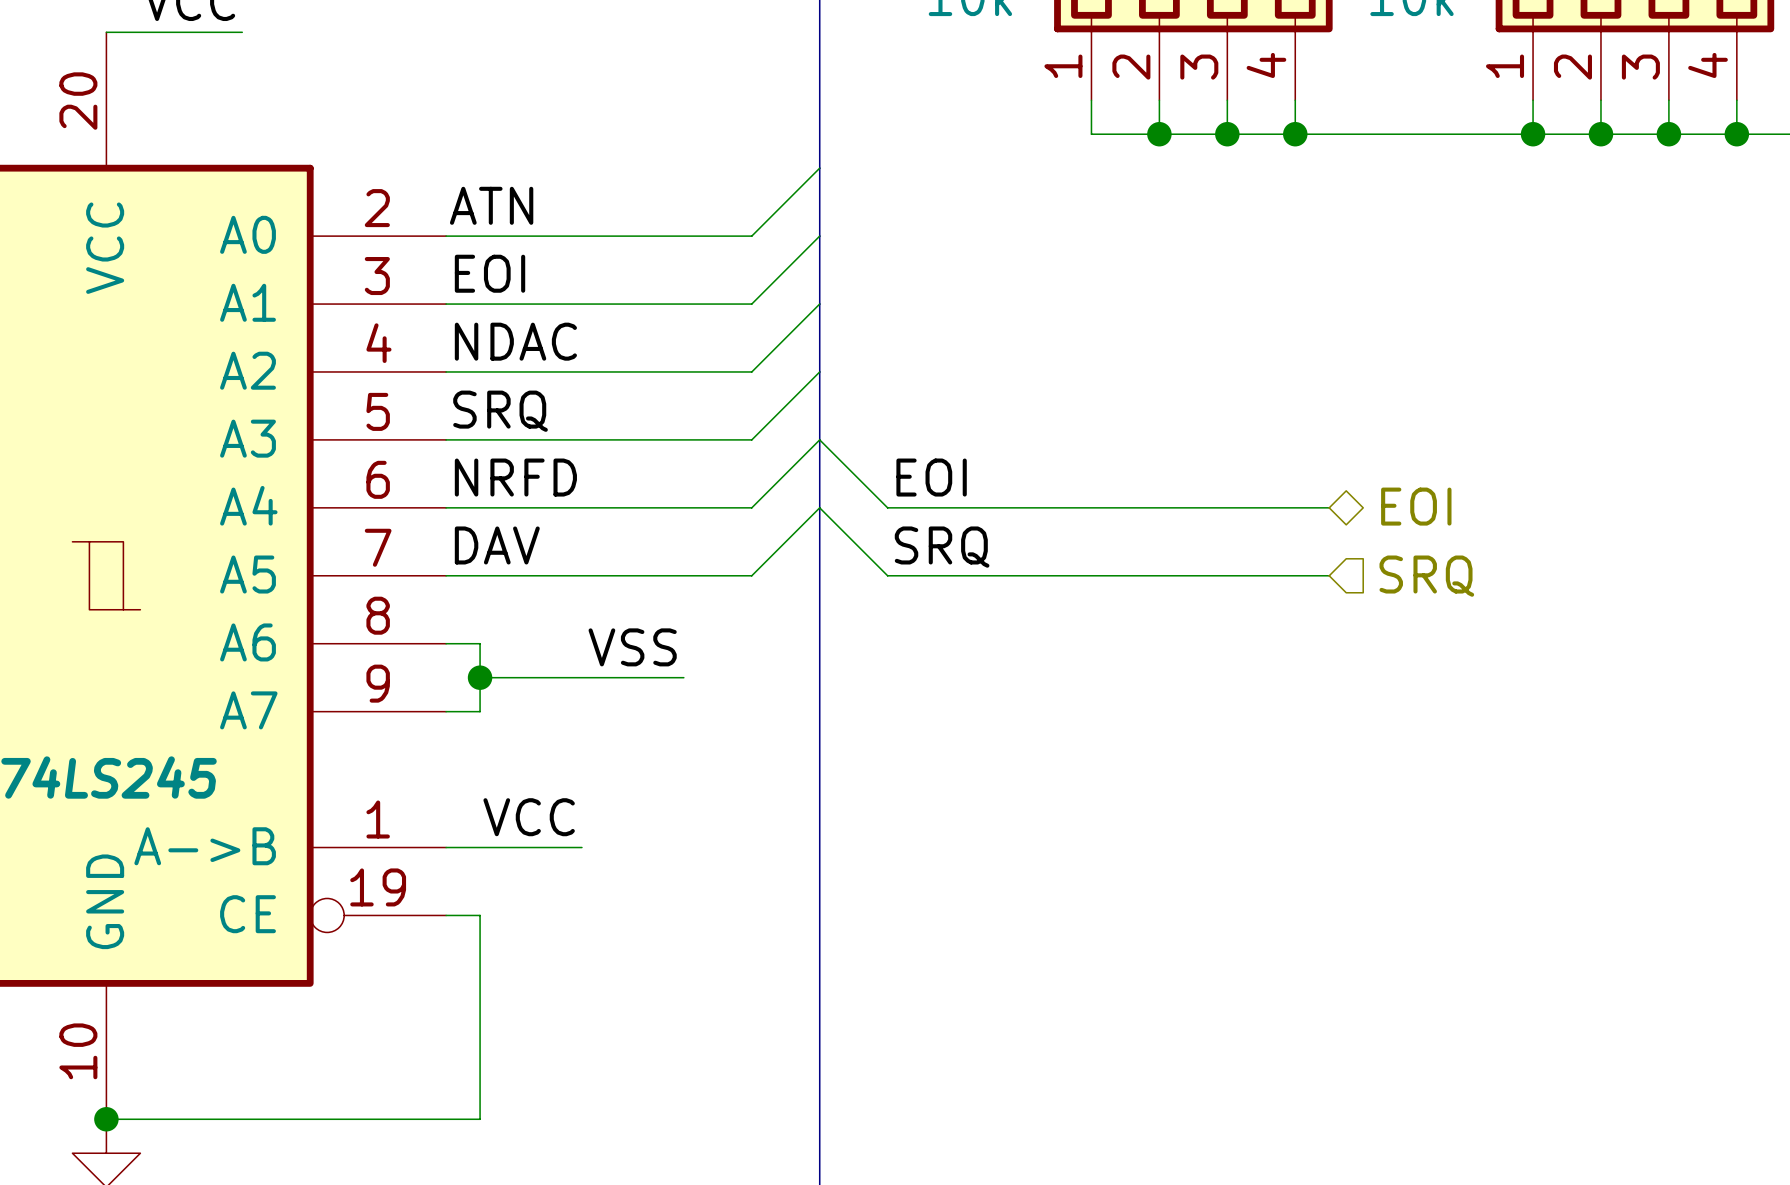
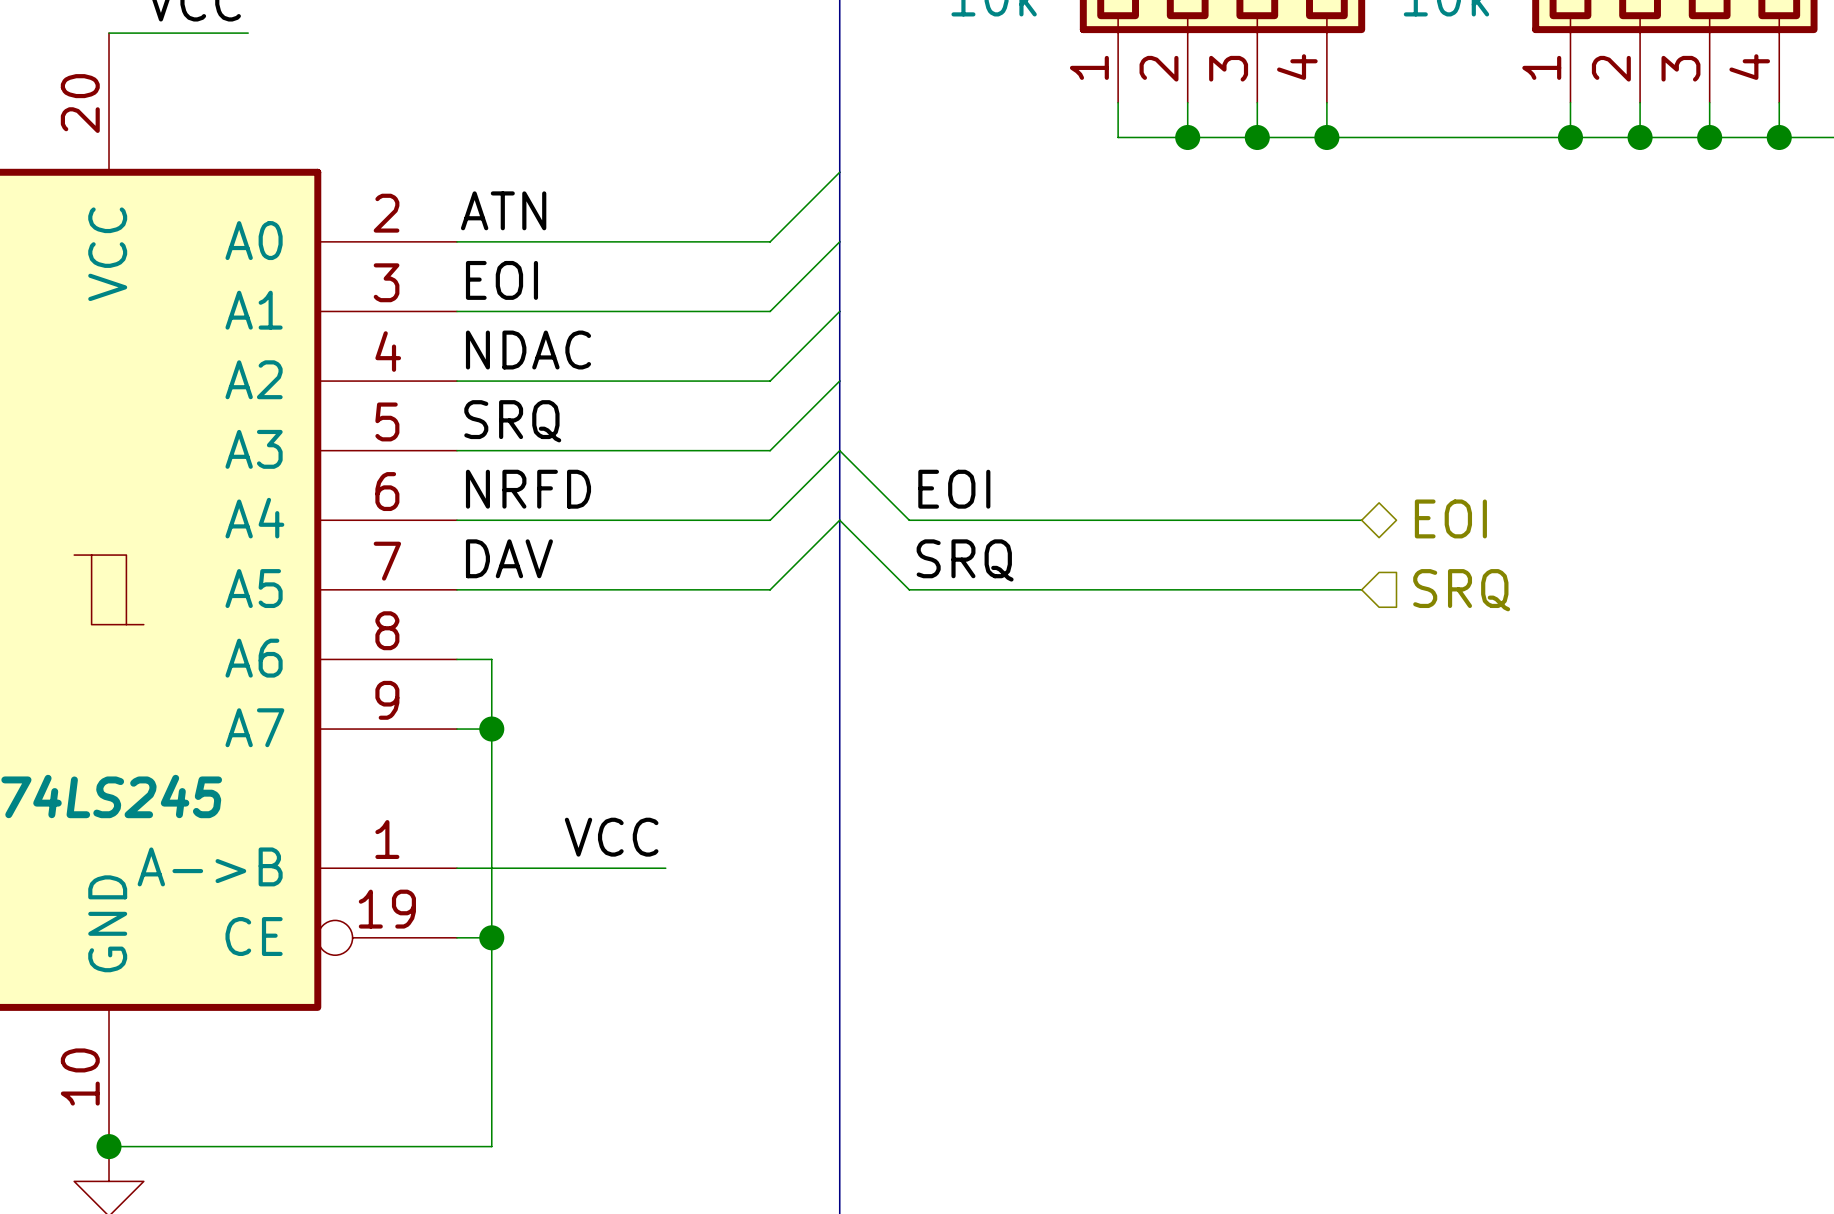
label: VSS (632, 647) -> none
wire: (480, 677) (683, 677) -> none
junction position: (480, 677) -> (491, 729)
wire: none -> (491, 729) (491, 937)
label position: VCC (529, 817) -> VCC (611, 837)
wire: none -> (596, 868) (665, 868)
junction: none -> (491, 937)

